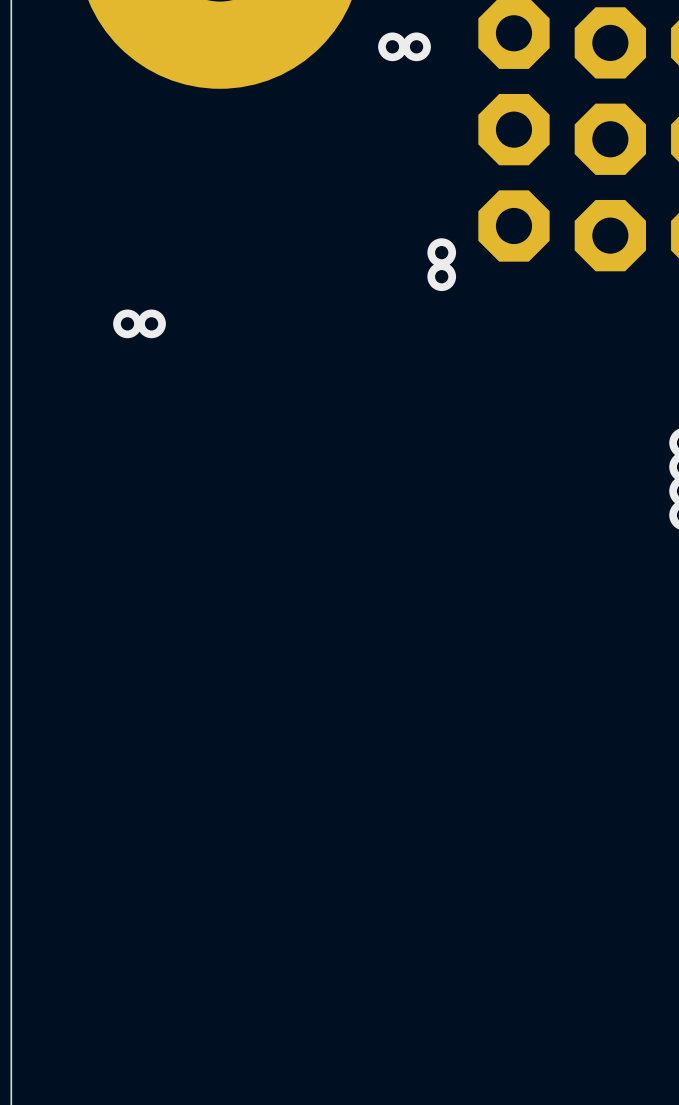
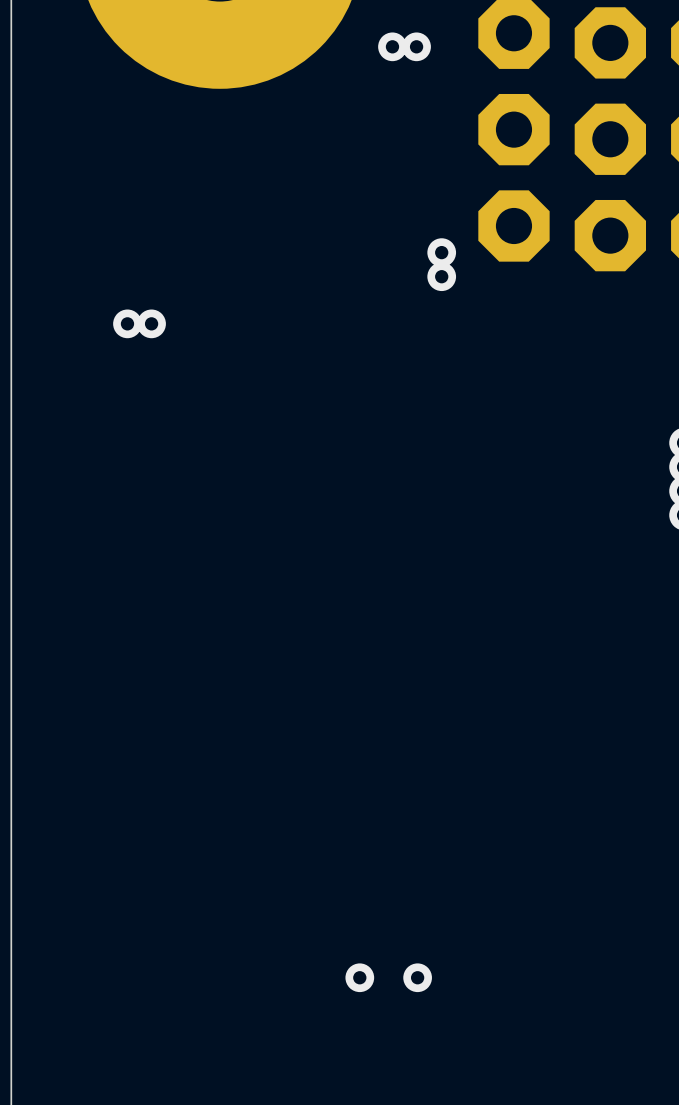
via: none -> (359, 977)
via: none -> (417, 977)

